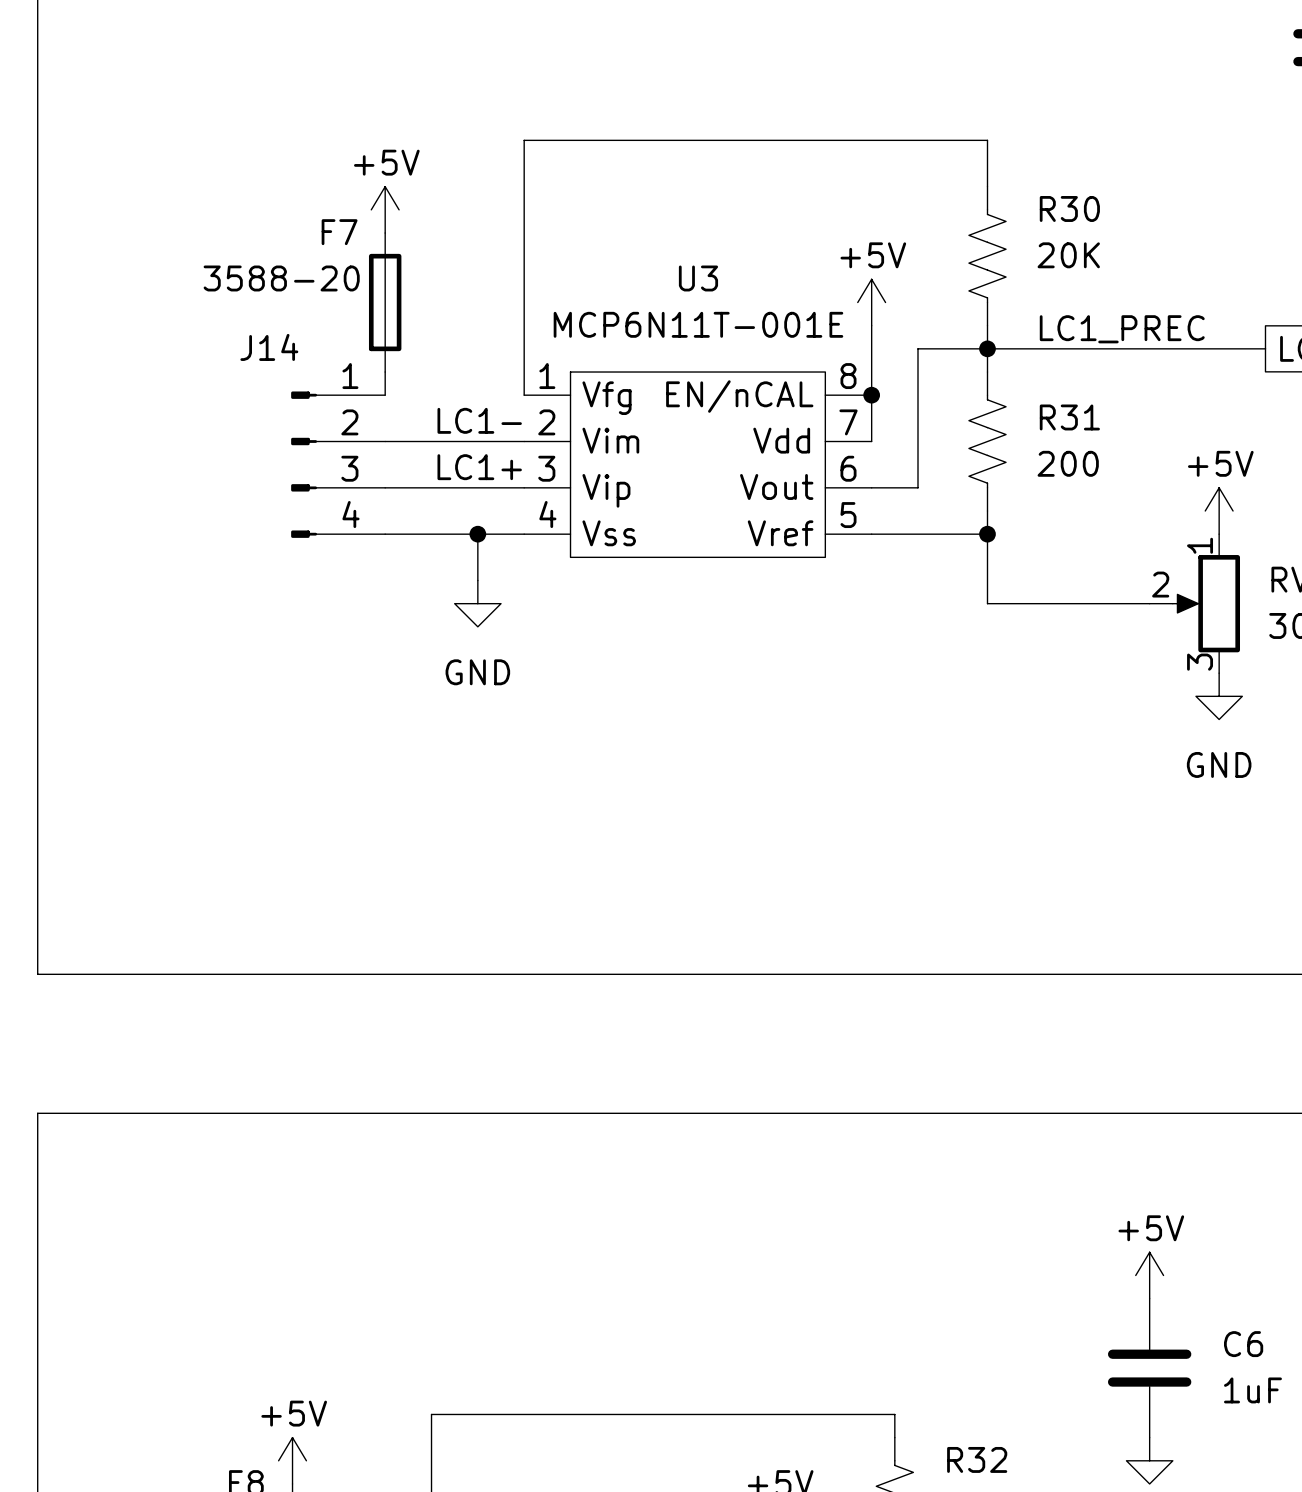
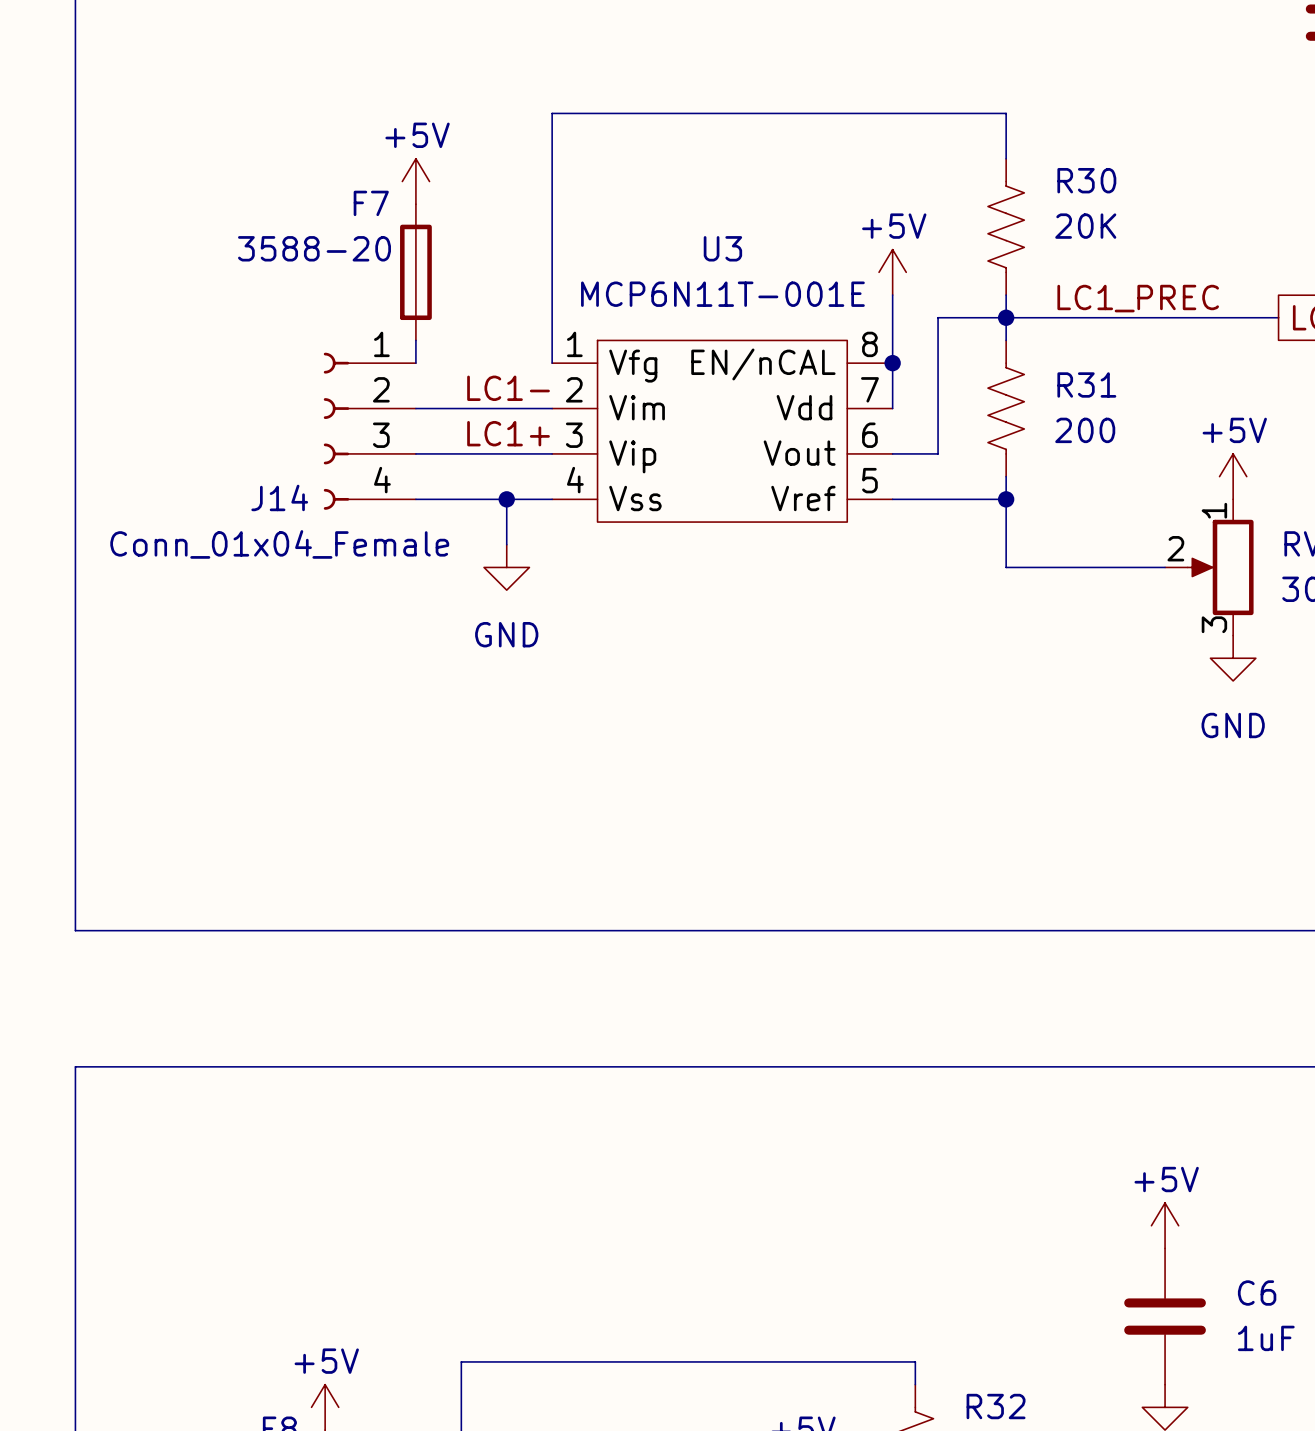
J14 name position: J14 (269, 347) -> J14 (279, 497)
J14 symbol: [291, 391, 386, 538] -> [323, 352, 416, 510]
J14 value: none -> Conn_01x04_Female (279, 544)

